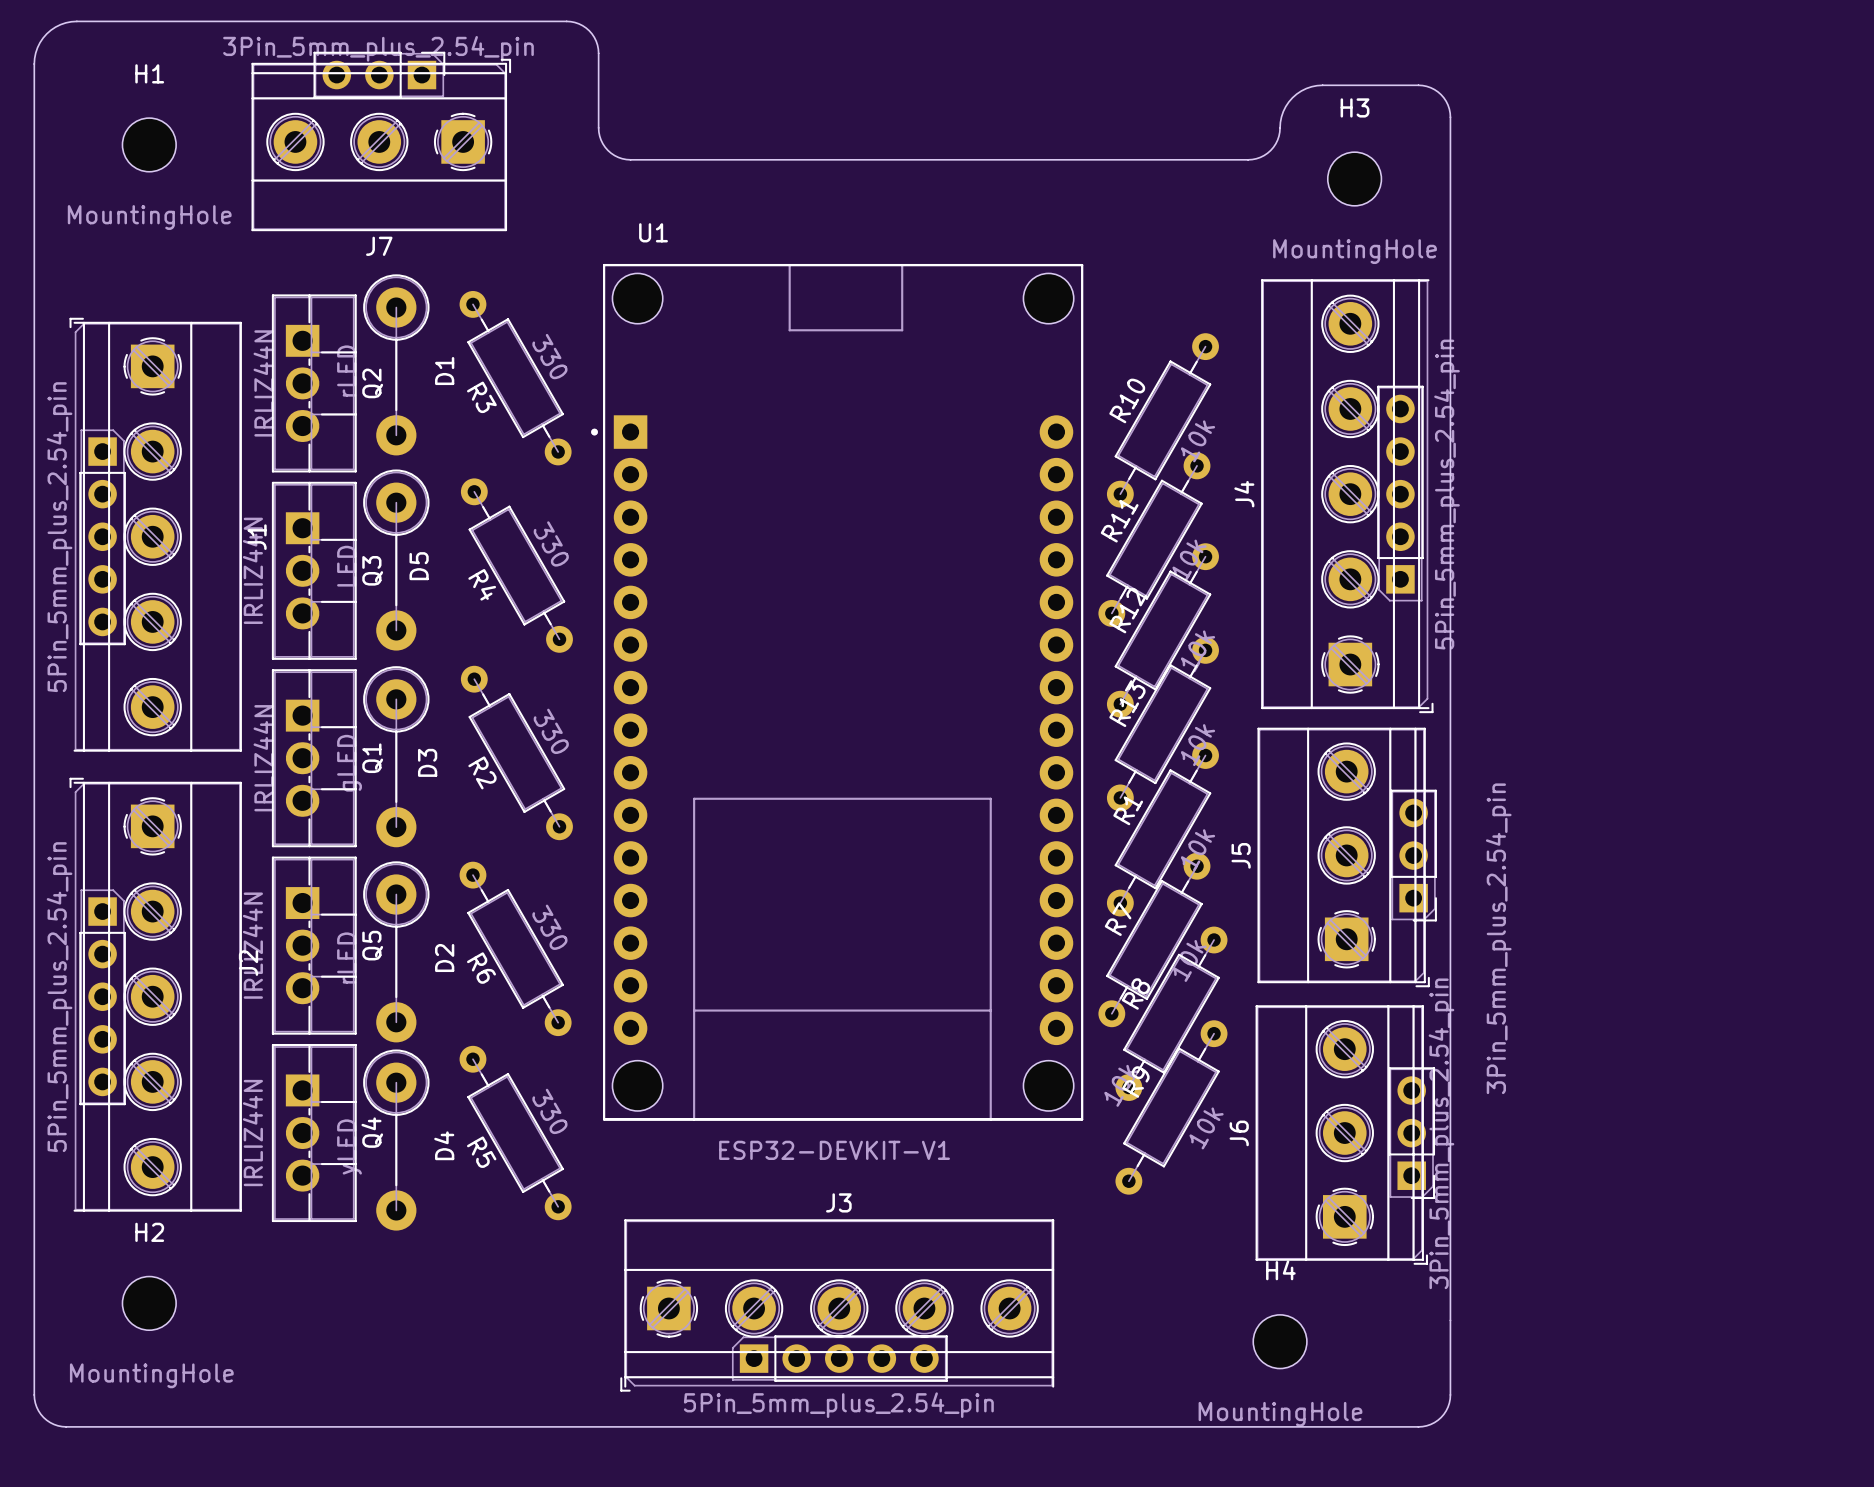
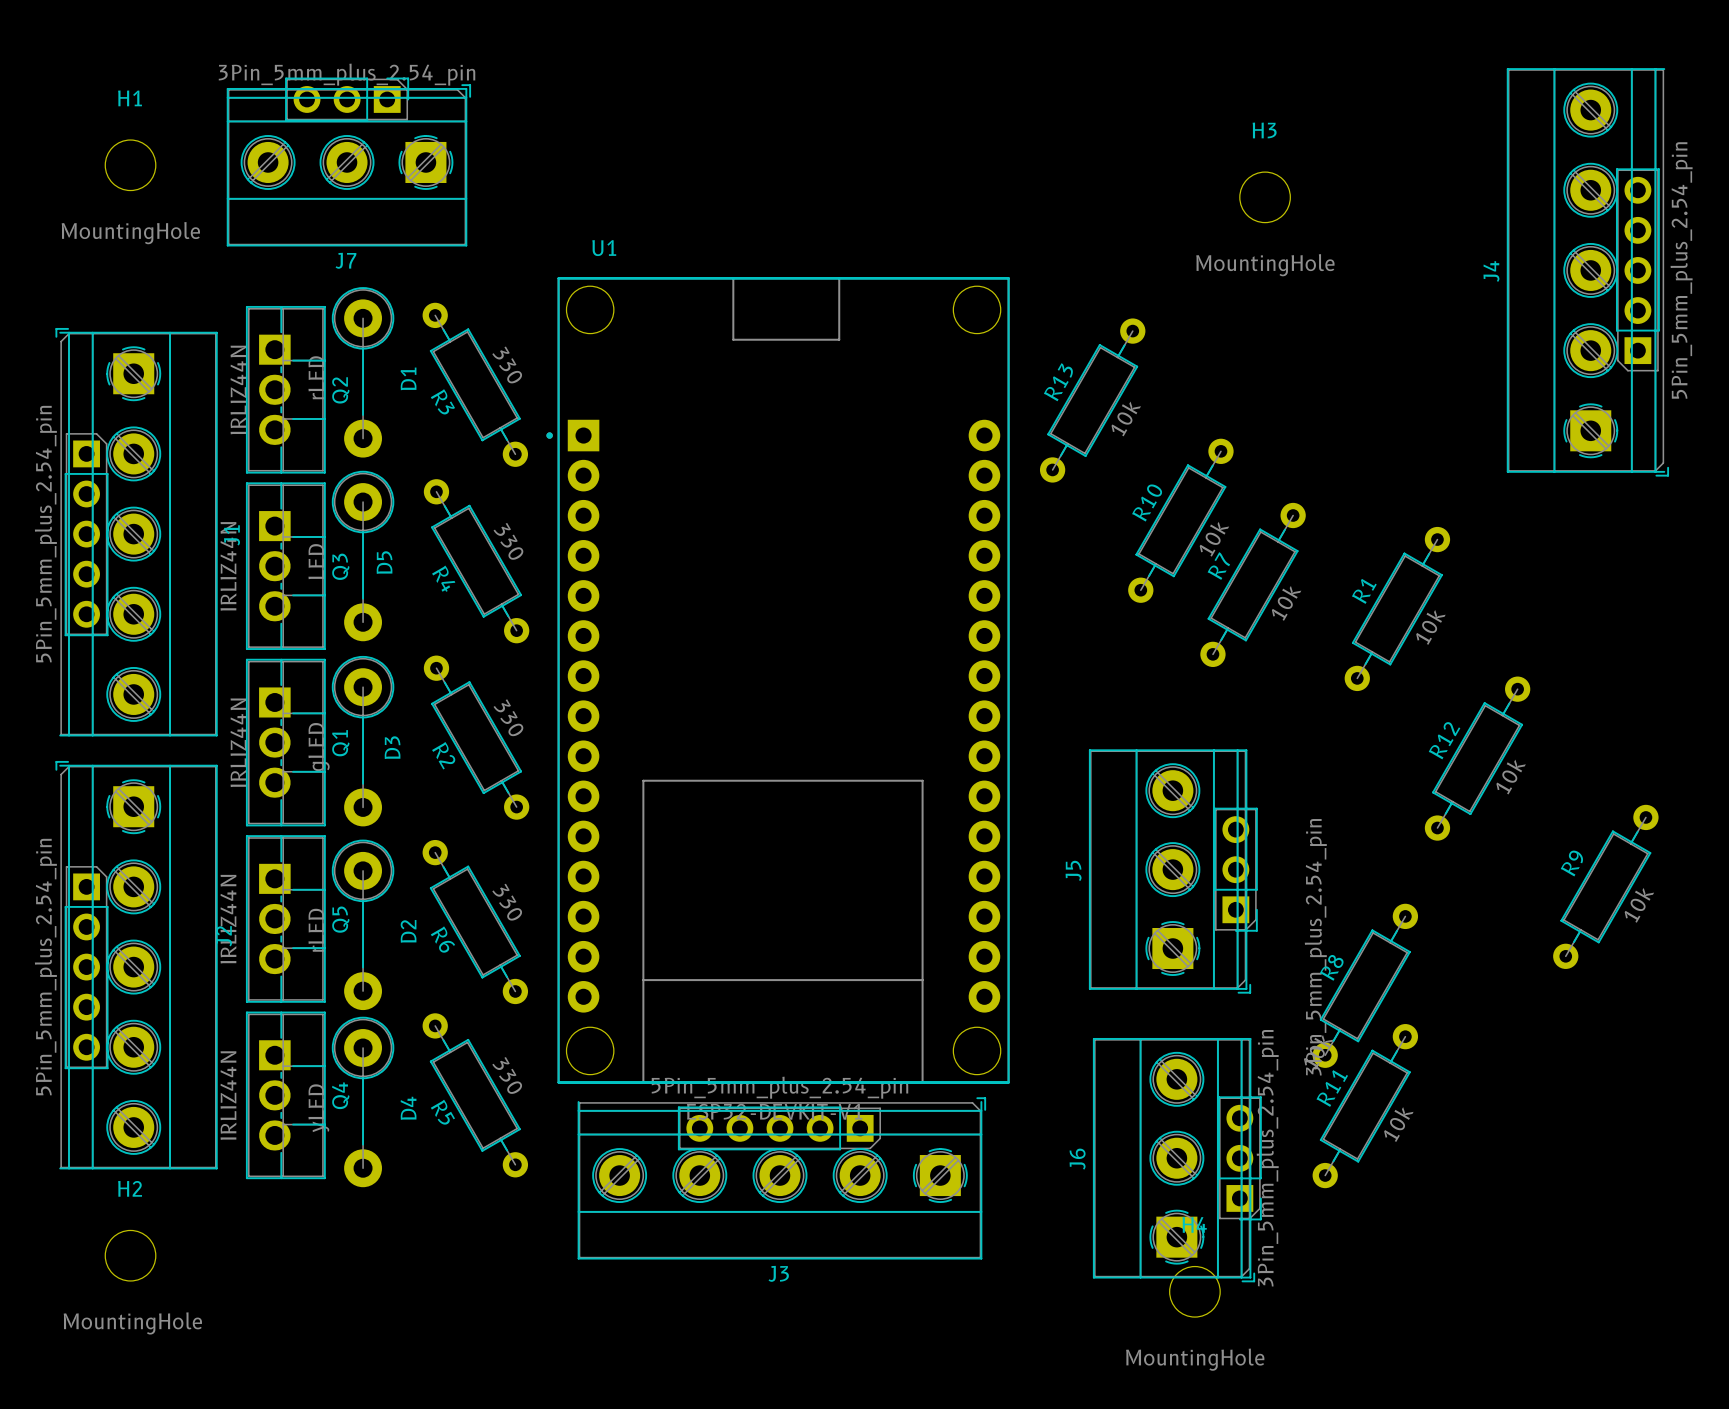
board edge: (76, 21) (574, 22) (589, 30) (597, 45) (598, 127) (601, 140) (611, 153) (618, 157) (630, 159) (1252, 159) (1264, 155) (1273, 147) (1278, 136) (1281, 116) (1285, 106) (1292, 97) (1306, 88) (1322, 85) (1418, 85) (1430, 87) (1441, 94) (1448, 105) (1450, 117) (1450, 1394) (1448, 1407) (1441, 1417) (1430, 1424) (1418, 1426) (66, 1426) (54, 1424) (43, 1417) (36, 1407) (34, 1394) (34, 64) (37, 47) (46, 33) (60, 24) (76, 21) -> none
R10 position: (1162, 420) -> (1180, 520)
J4 position: (1347, 496) -> (1587, 272)
R11 position: (1154, 539) -> (1365, 1106)
R12 position: (1162, 630) -> (1477, 758)
R13 position: (1162, 724) -> (1092, 400)
R1 footprint: [1106, 742, 1219, 917] -> [1344, 526, 1451, 692]
J5 position: (1347, 857) -> (1173, 871)
R7 position: (1154, 940) -> (1253, 584)
R8 position: (1171, 1013) -> (1365, 985)
R9 position: (1171, 1107) -> (1605, 886)
J6 position: (1345, 1135) -> (1177, 1160)
J3 rotation: 0° (837, 1305) -> 180° (781, 1178)

